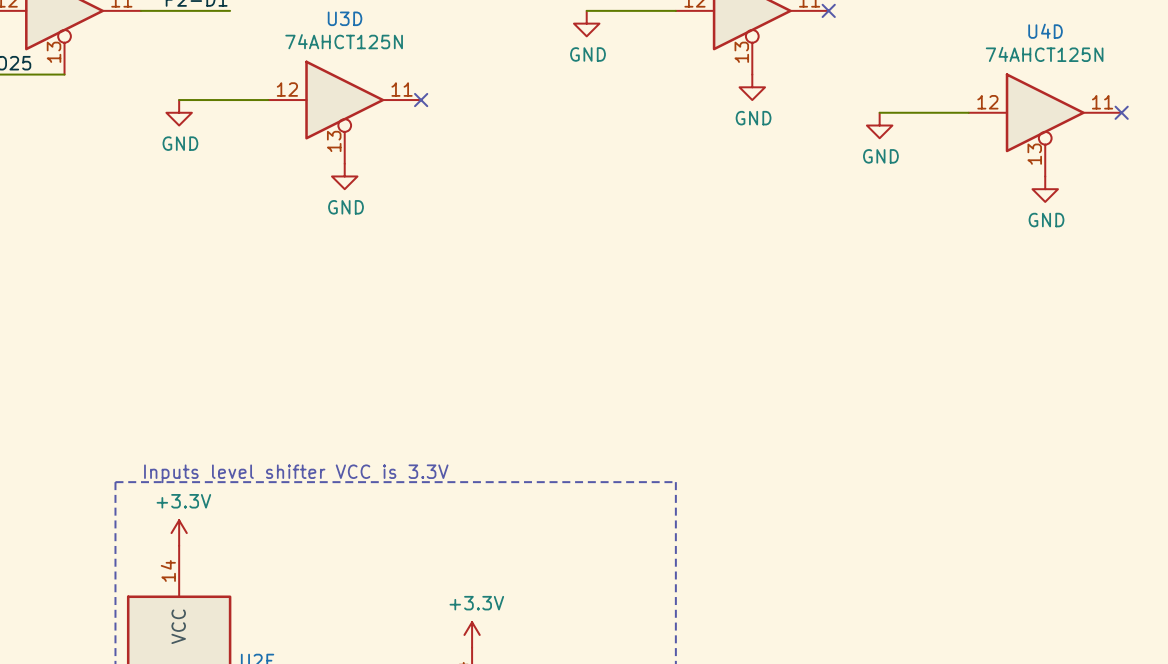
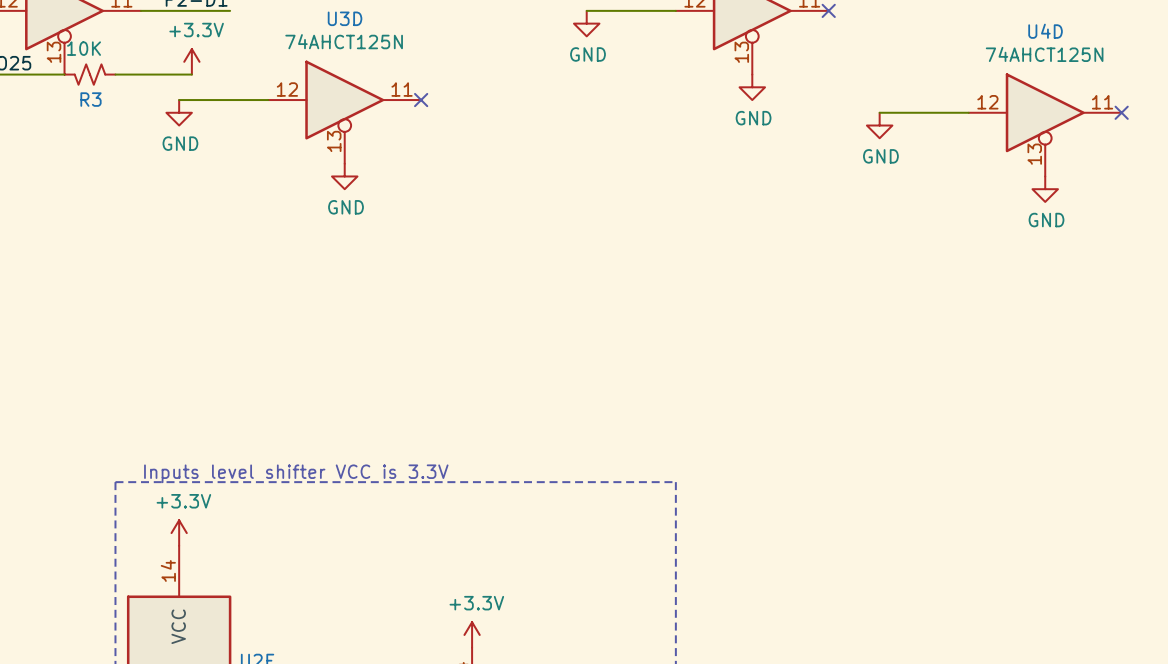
power symbol: none -> +3.3V (191, 61)
R3: none -> 10K (90, 74)
wire: none -> (115, 74) (191, 74)

